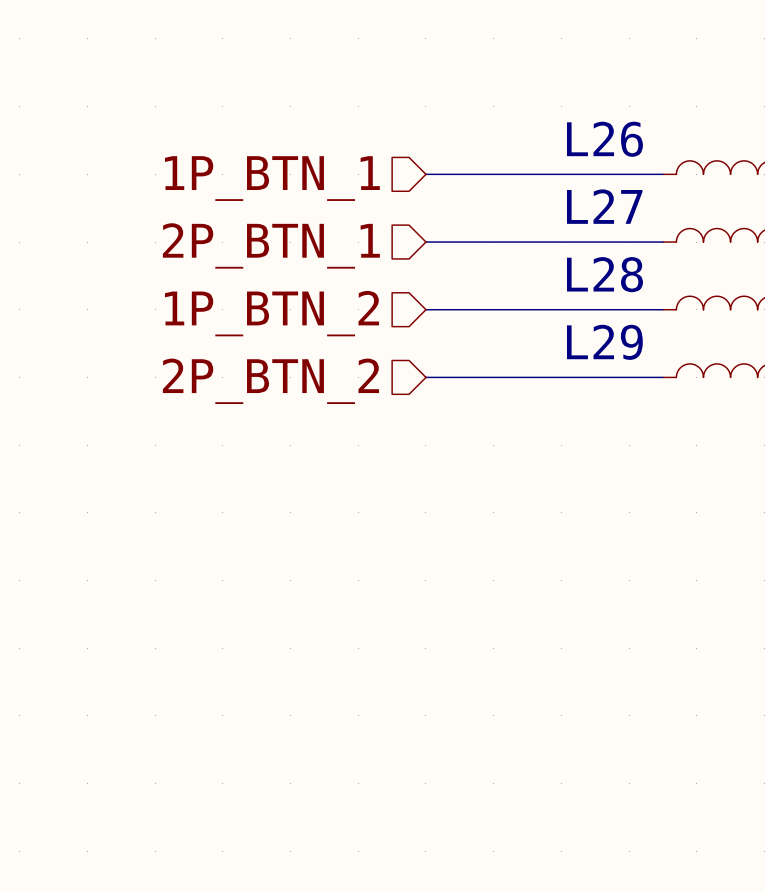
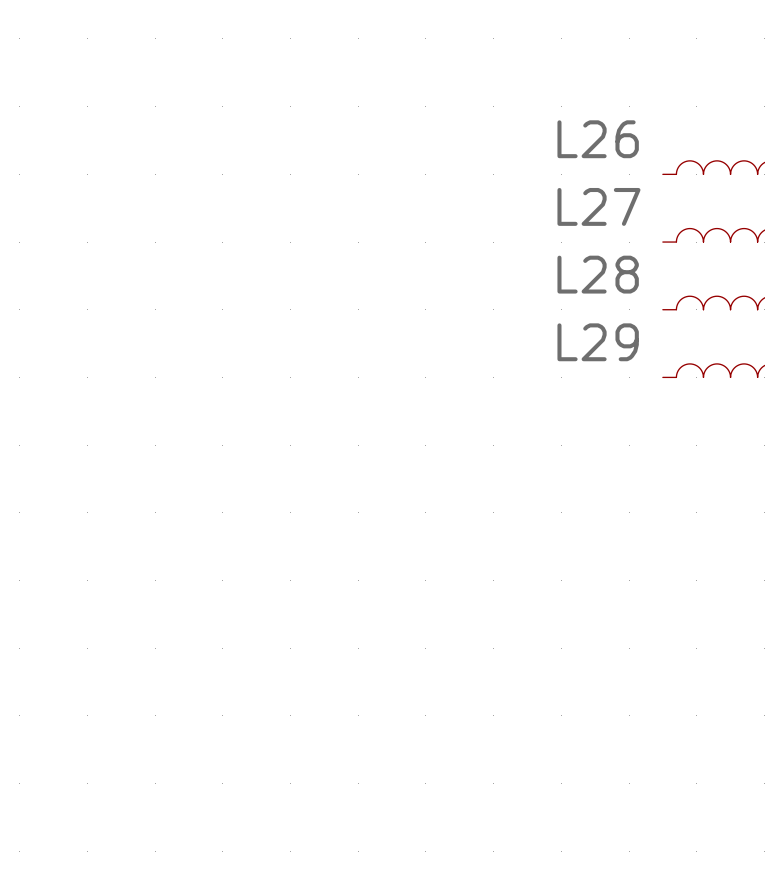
wire: (425, 174) (662, 174) -> none
hierarchical label: 1P_BTN_1 (272, 178) -> none
wire: (425, 242) (662, 242) -> none
hierarchical label: 2P_BTN_1 (271, 245) -> none
wire: (425, 309) (662, 309) -> none
hierarchical label: 1P_BTN_2 (272, 313) -> none
wire: (425, 377) (662, 377) -> none
hierarchical label: 2P_BTN_2 (270, 381) -> none

